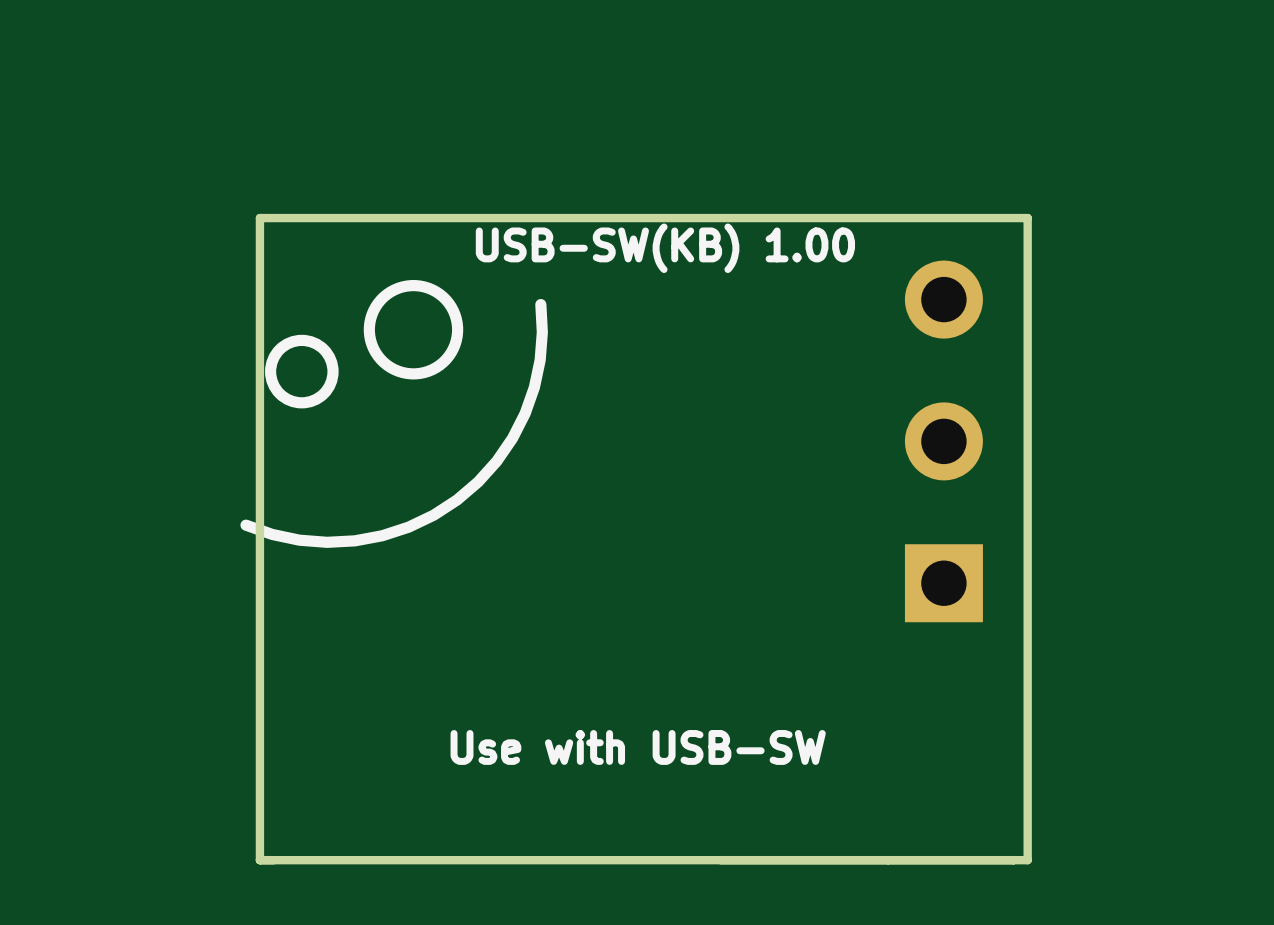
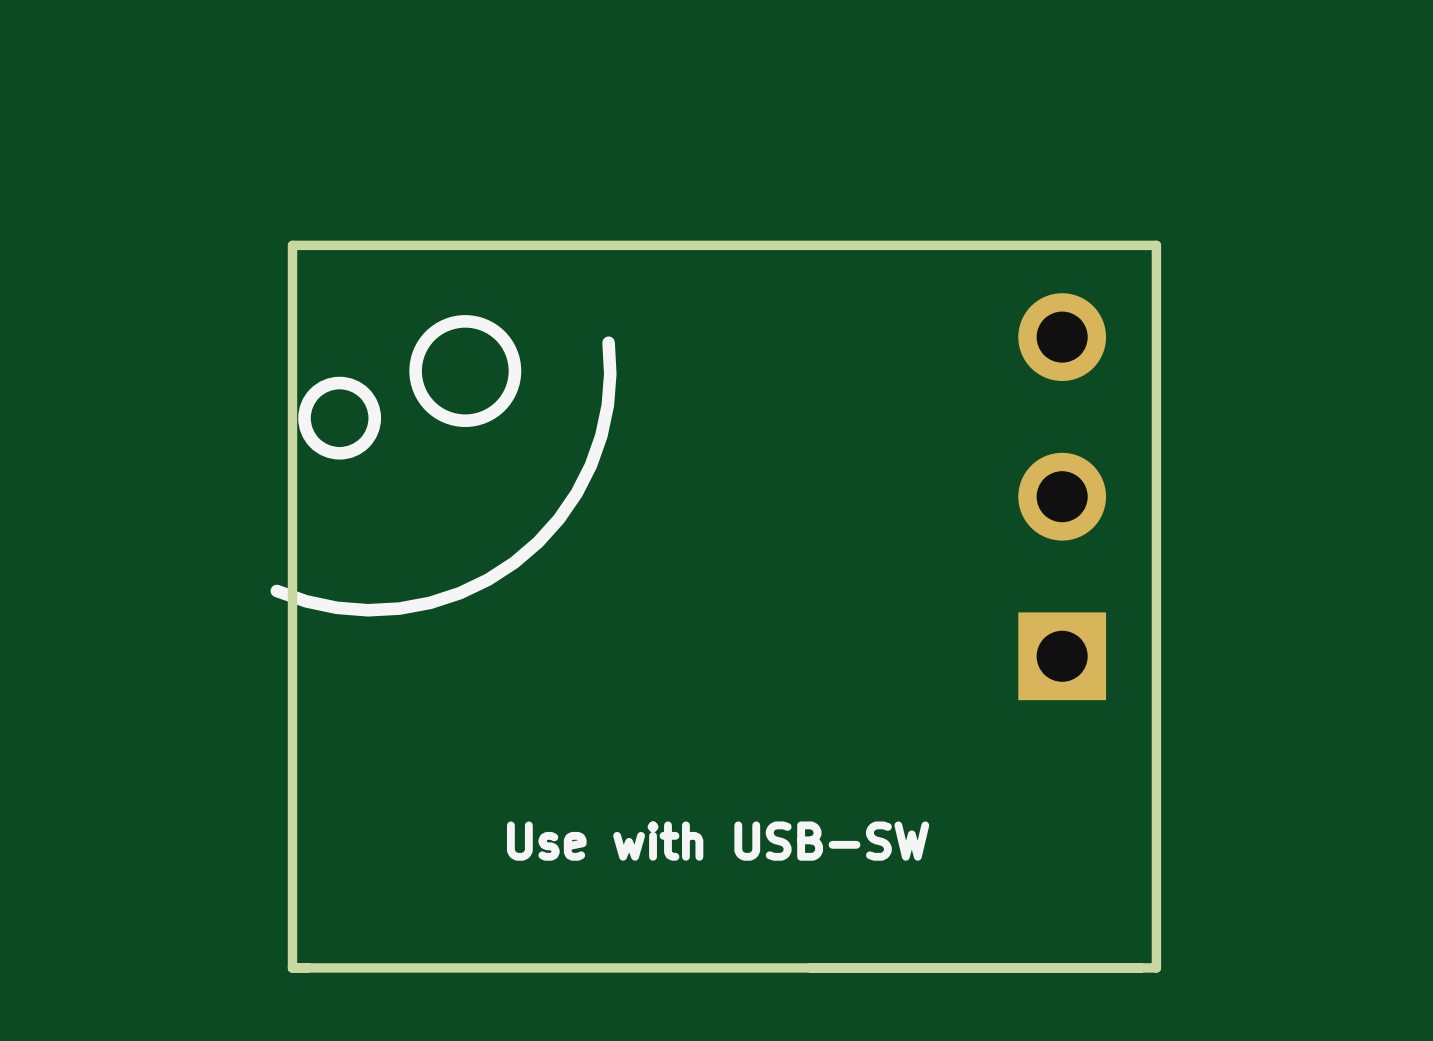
text: USB-SW(KB) 1.00 (665, 248) -> none

